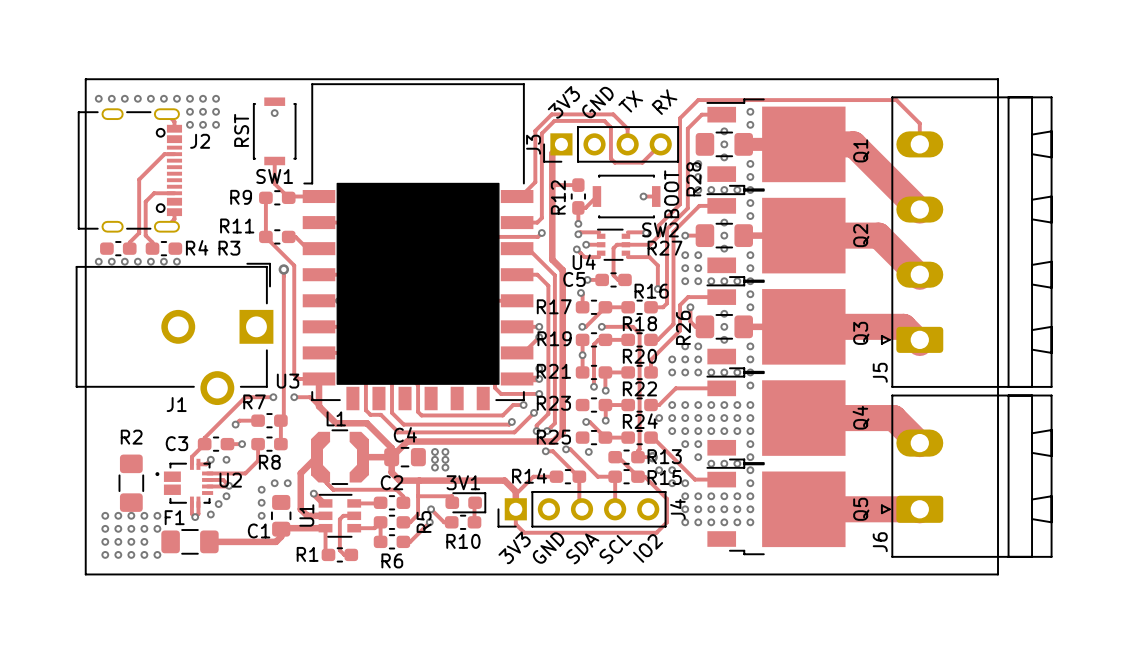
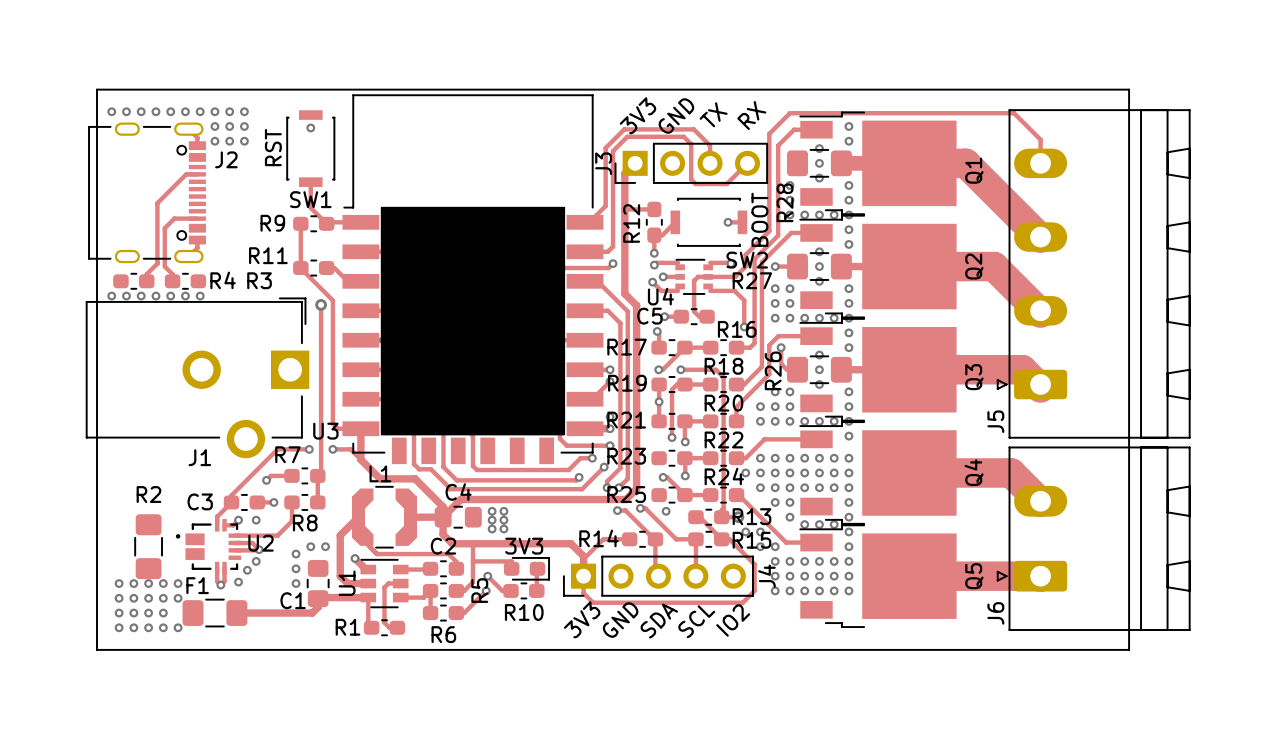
3V1 name: 3V1 (463, 482) -> 3V3 (524, 546)

